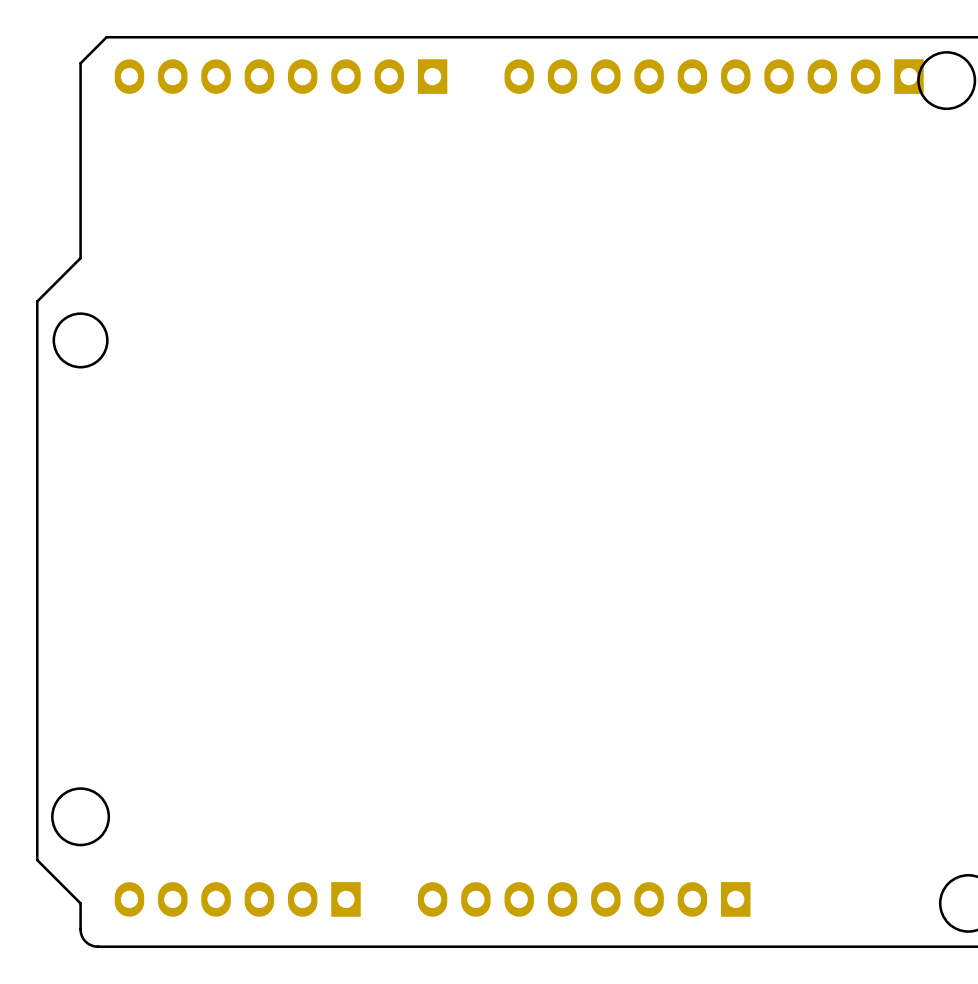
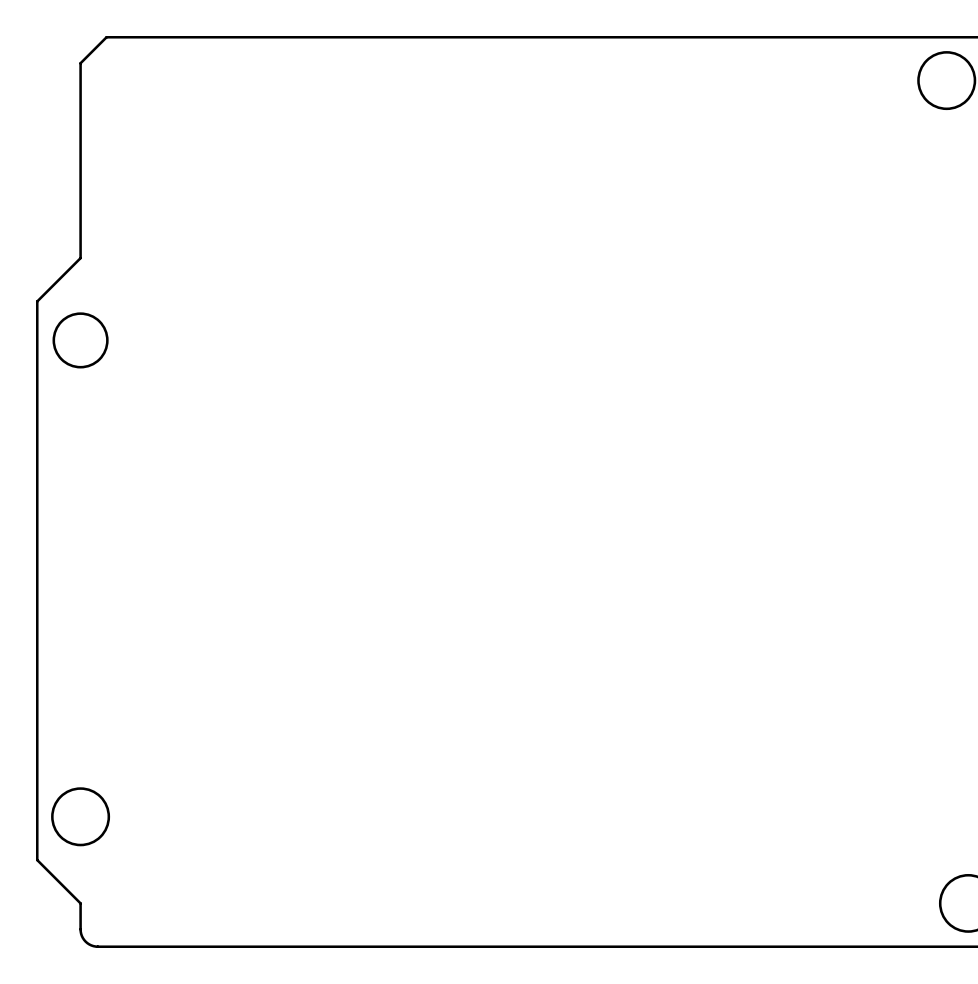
part: (281, 76) -> none
part: (714, 76) -> none
part: (237, 899) -> none
part: (584, 899) -> none

